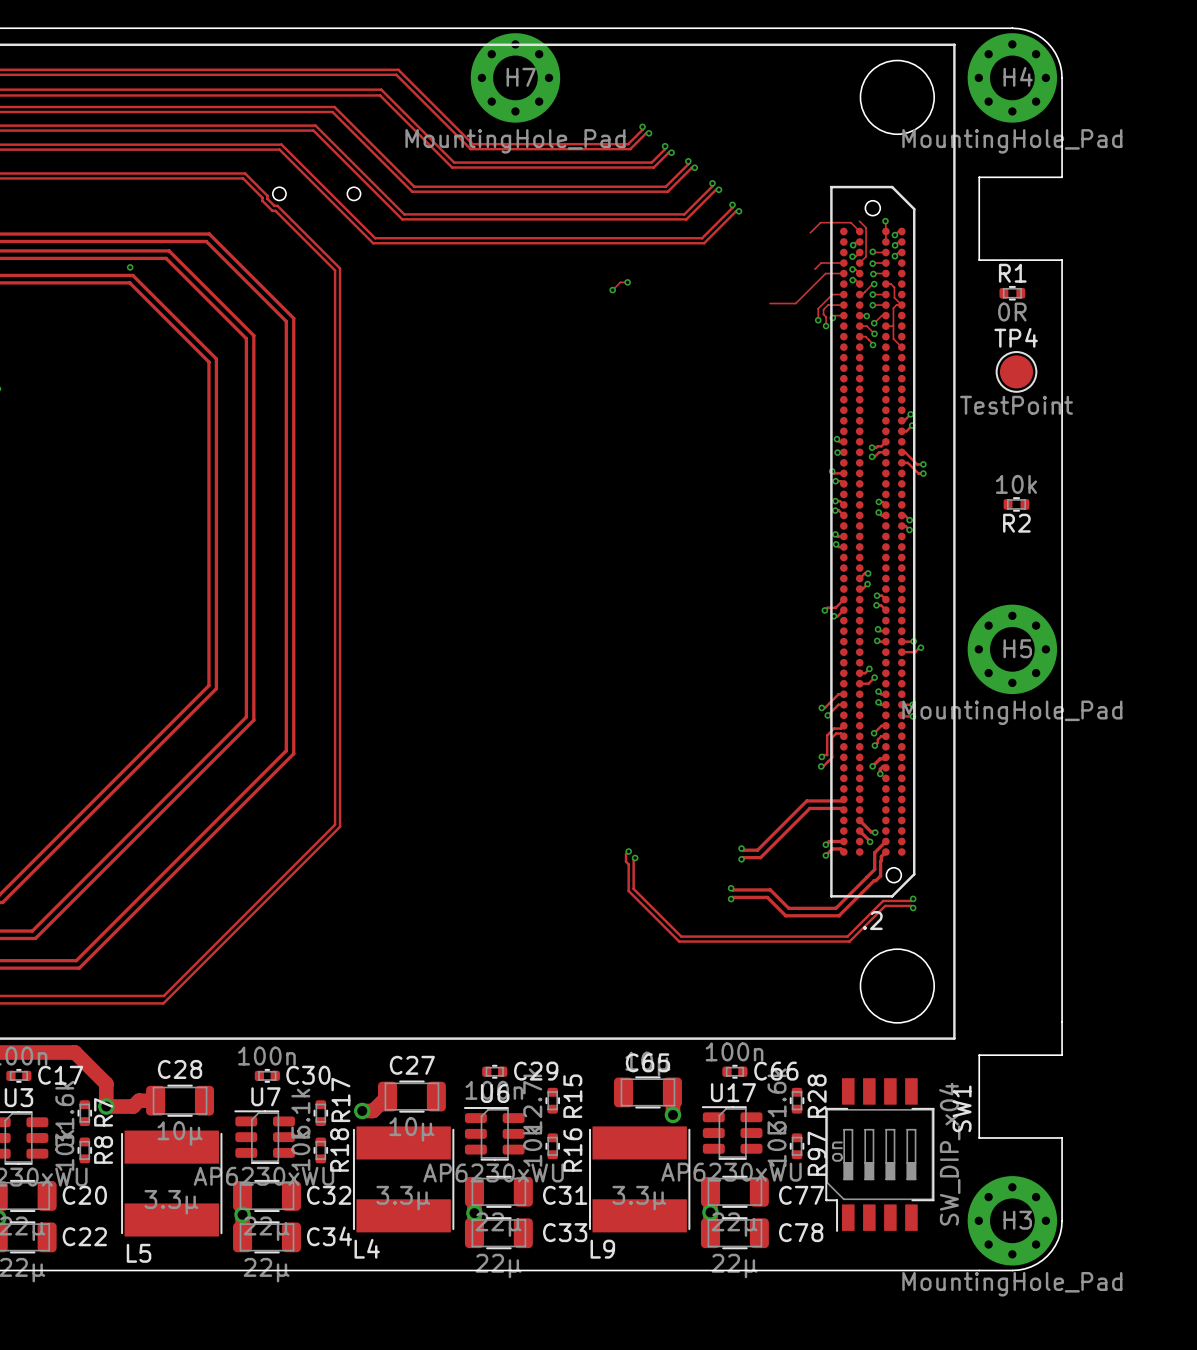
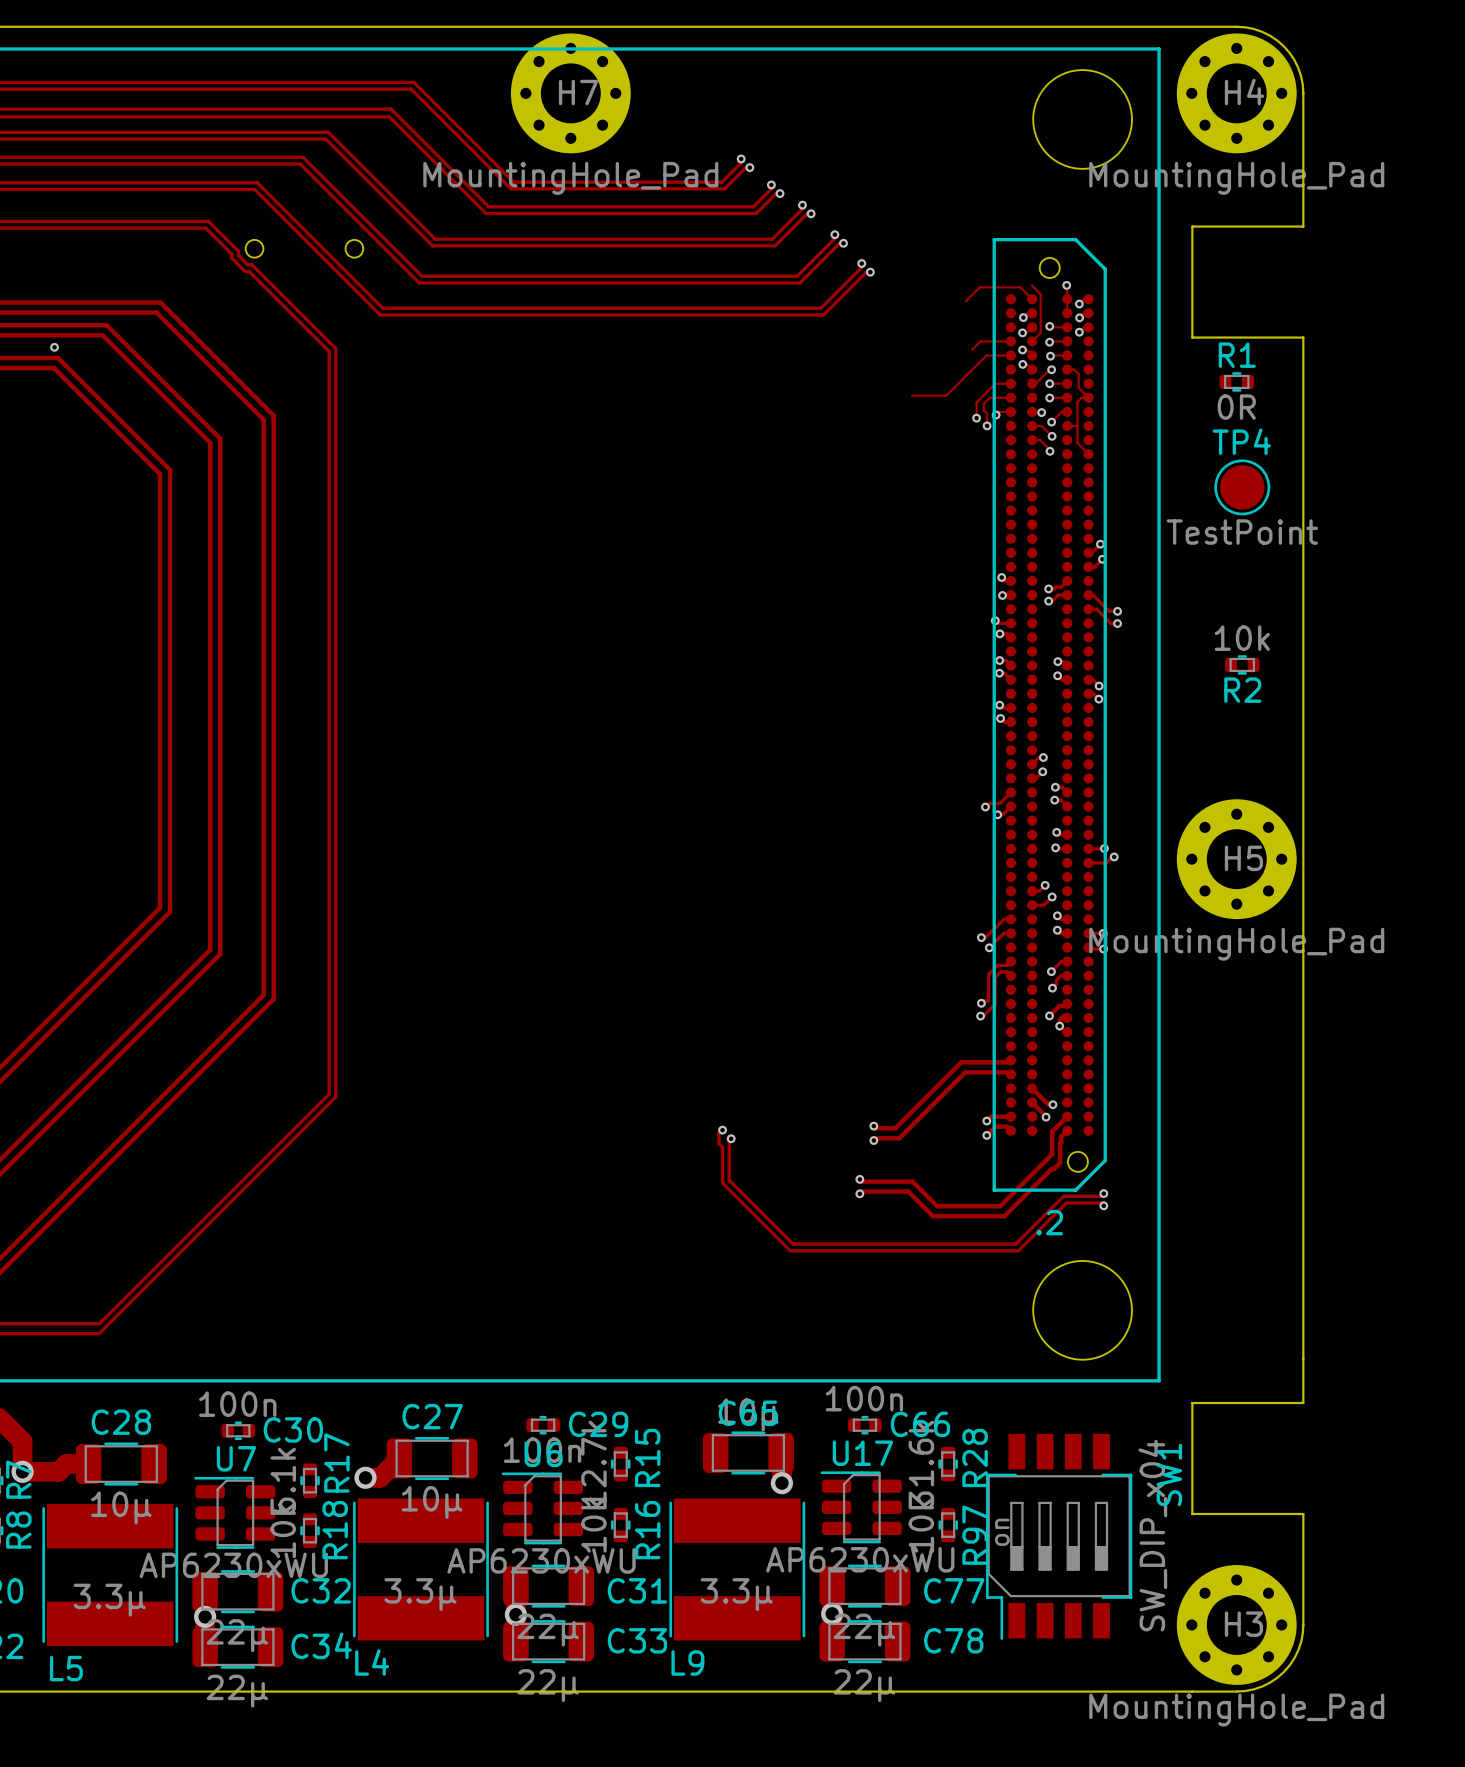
track: (627, 282) (620, 282) (612, 290) -> none
via: (627, 282) -> none
via: (612, 290) -> none

